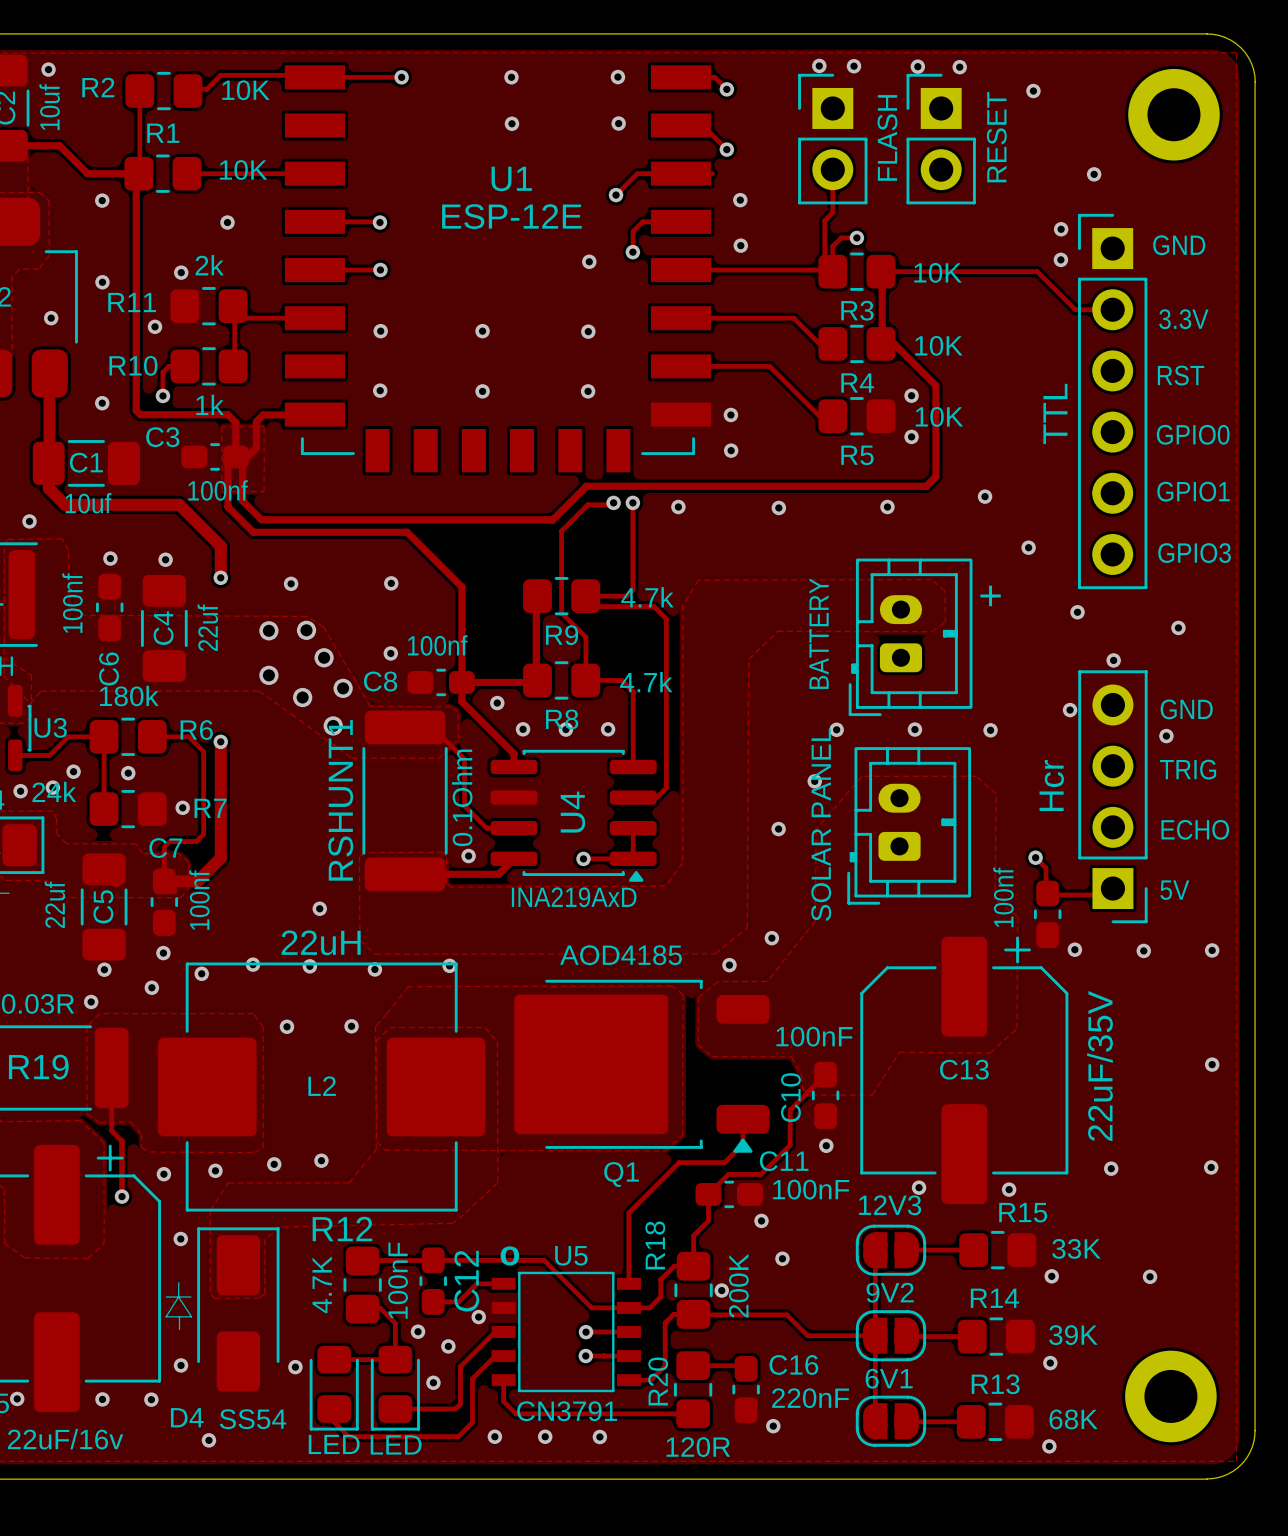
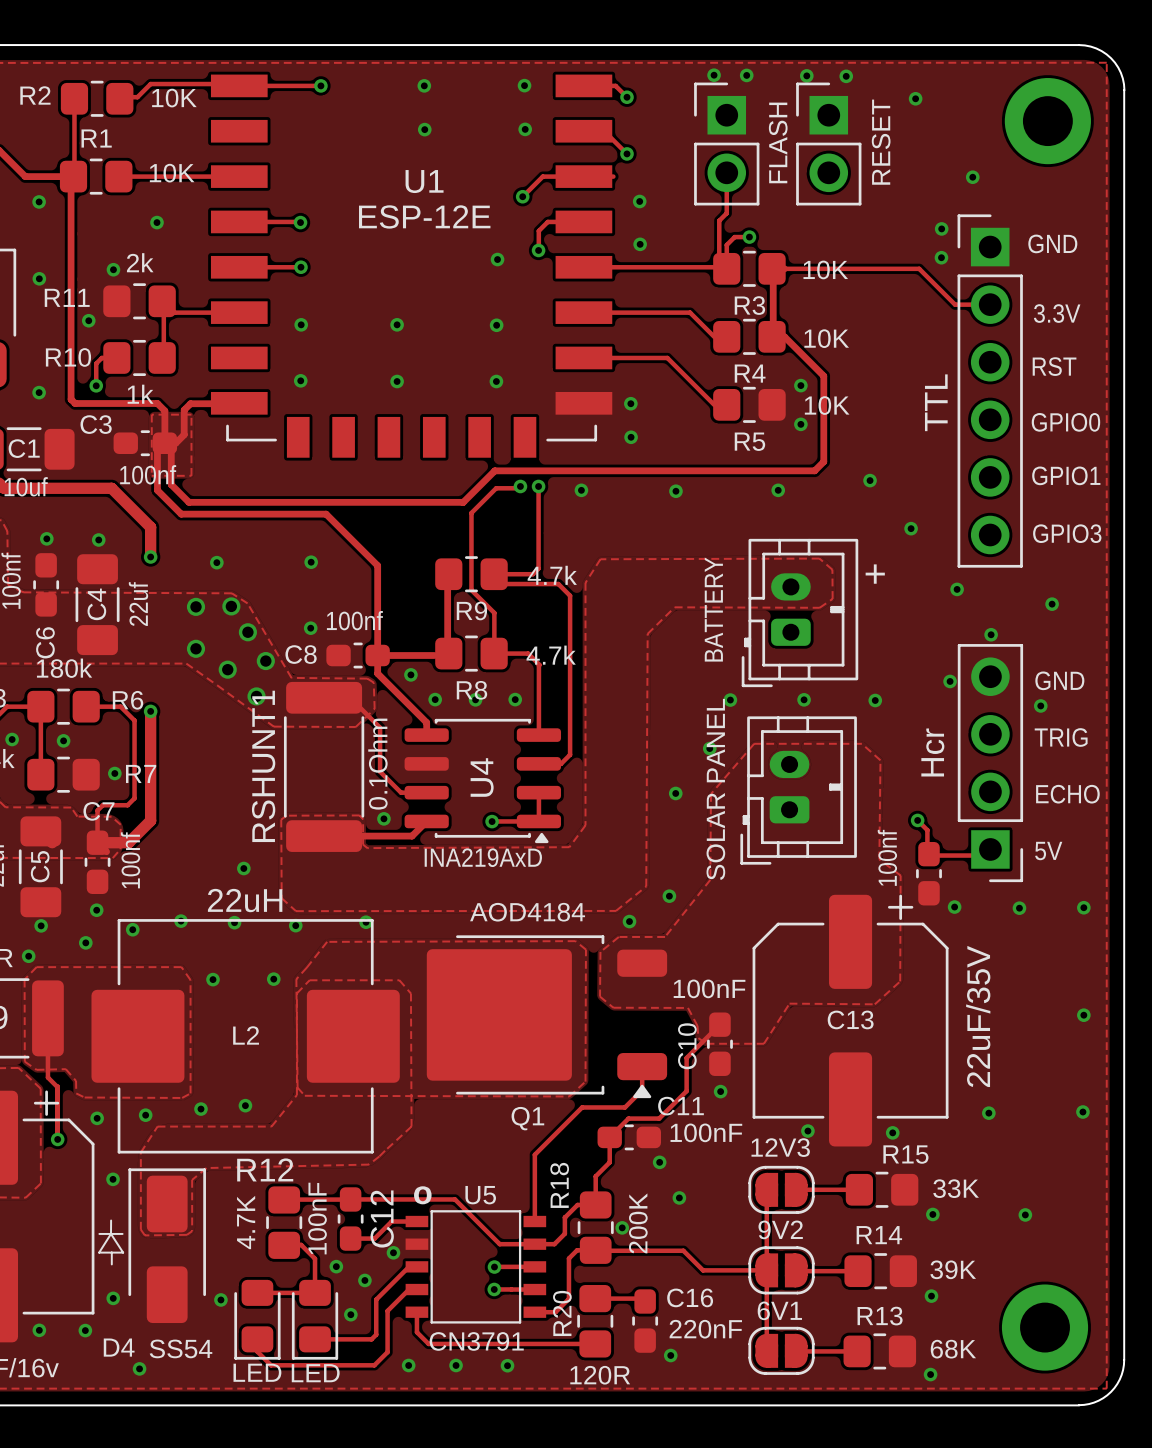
Q1 value: AOD4185 (621, 955) -> AOD4184 (527, 912)

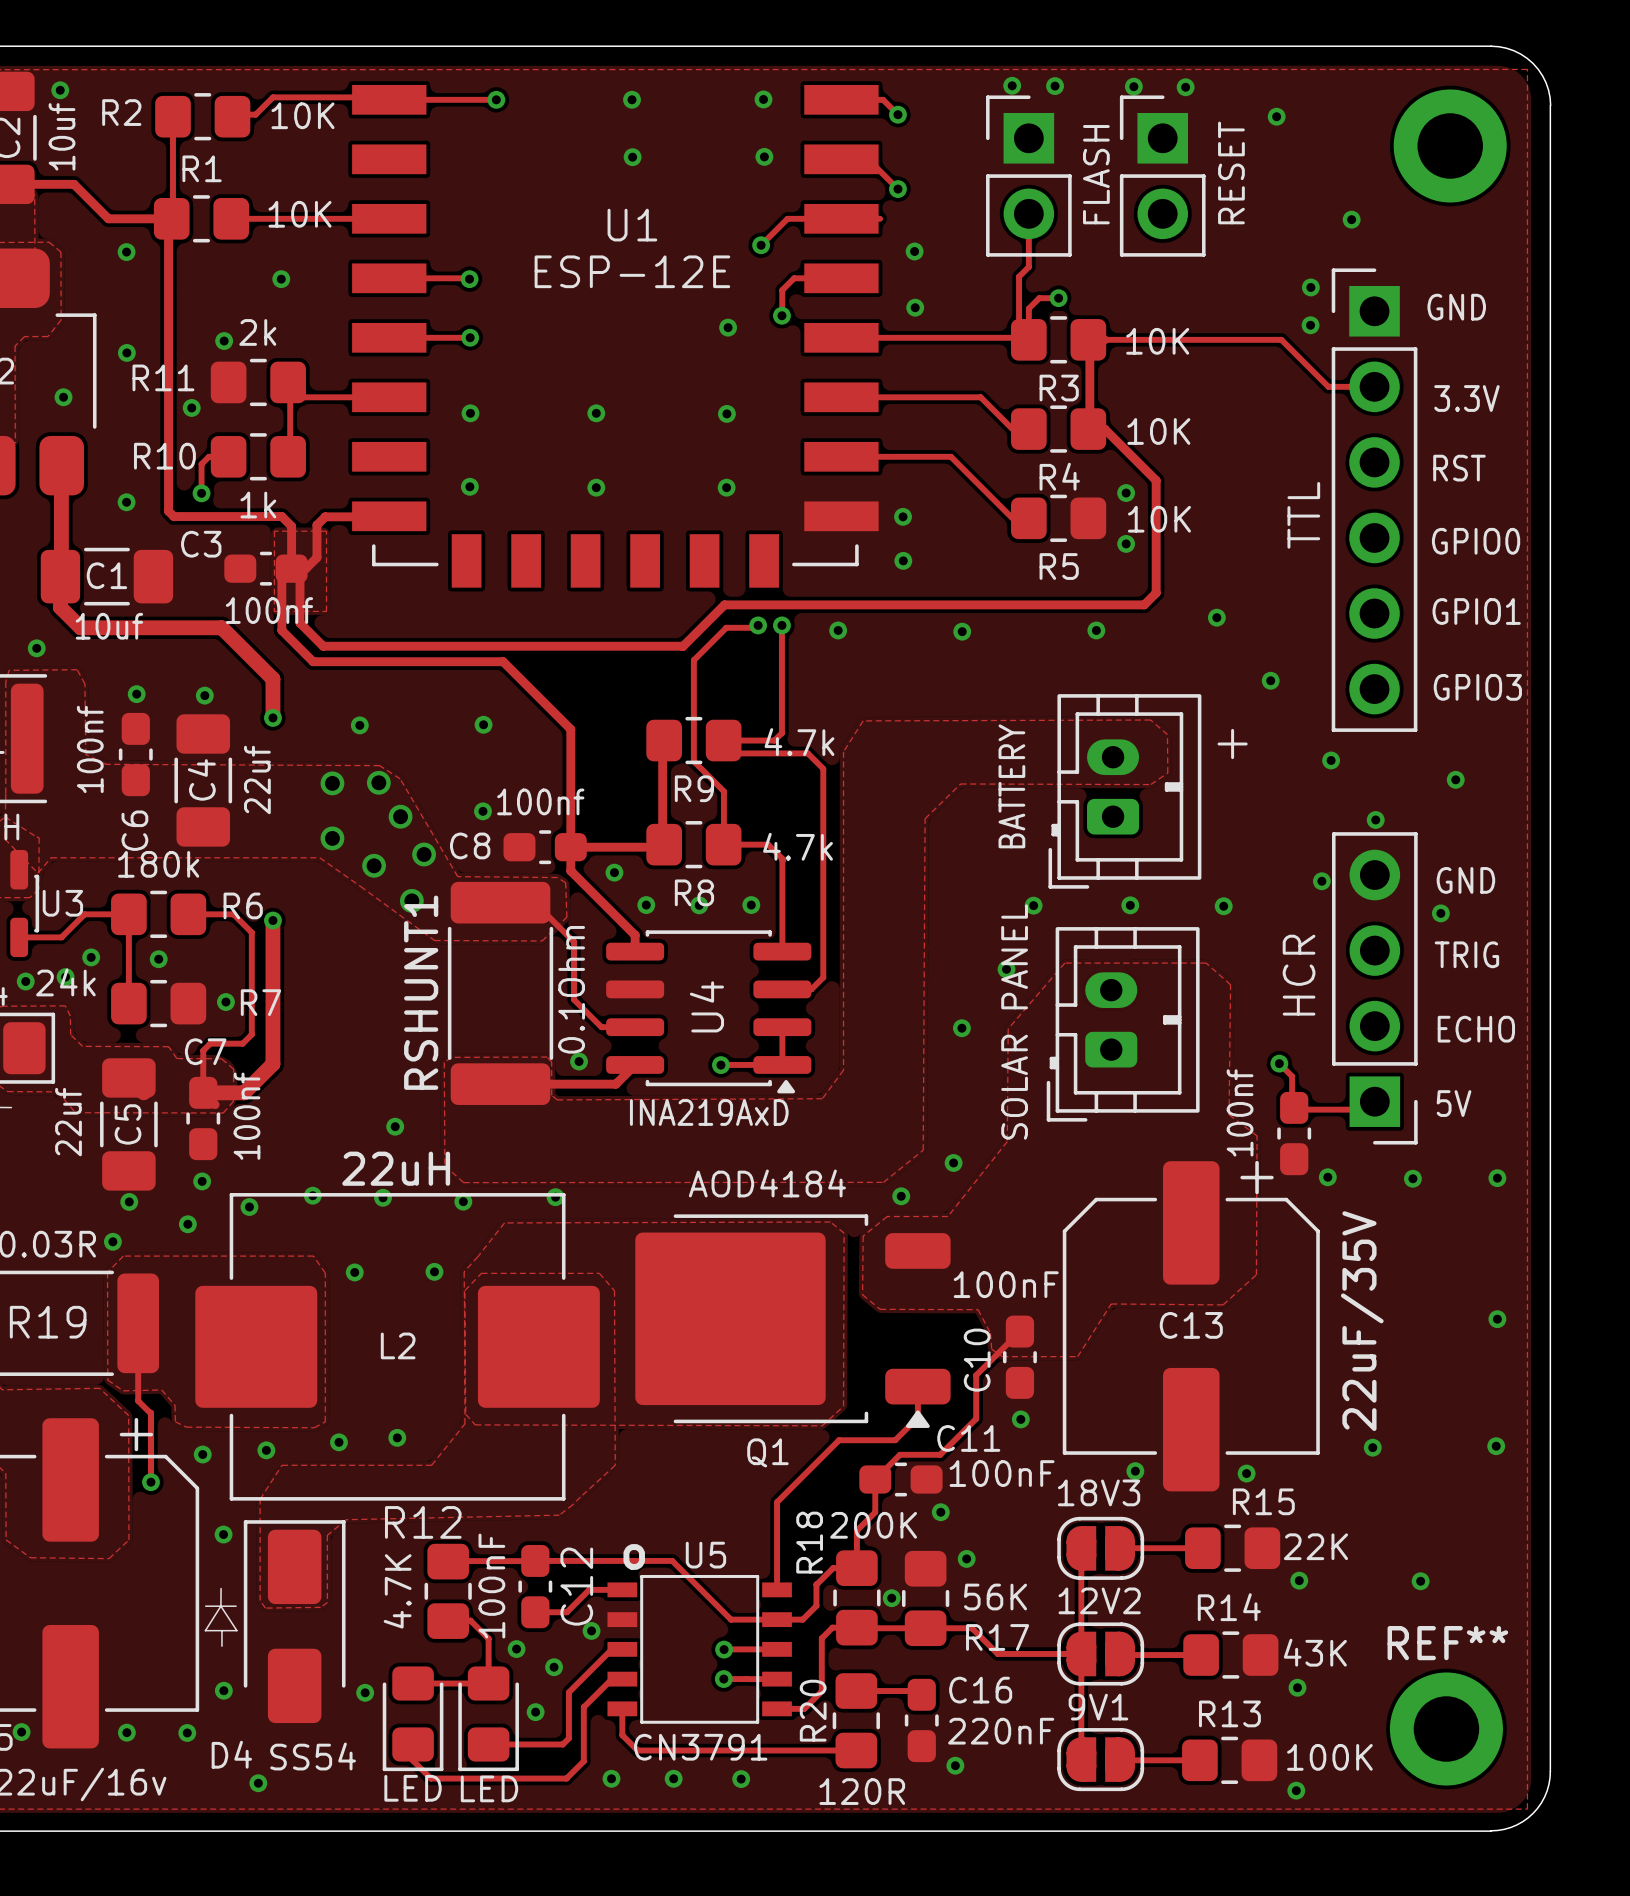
part value: Hcr (932, 752) -> HCR (1299, 975)
12V3 name: 12V3 (780, 1147) -> 18V3 (1099, 1492)
R15 value: 33K (956, 1188) -> 22K (1315, 1546)
R18 value rotation: 0° (638, 1223) -> 90° clockwise (873, 1525)
R17: none -> 56K (925, 1598)
9V2 name: 9V2 (780, 1229) -> 12V2 (1099, 1600)
REF** name: none -> REF** (1447, 1643)
R14 value: 39K (953, 1269) -> 43K (1315, 1652)
6V1 name: 6V1 (779, 1310) -> 9V1 (1098, 1707)
R13 value: 68K (953, 1349) -> 100K (1329, 1757)

